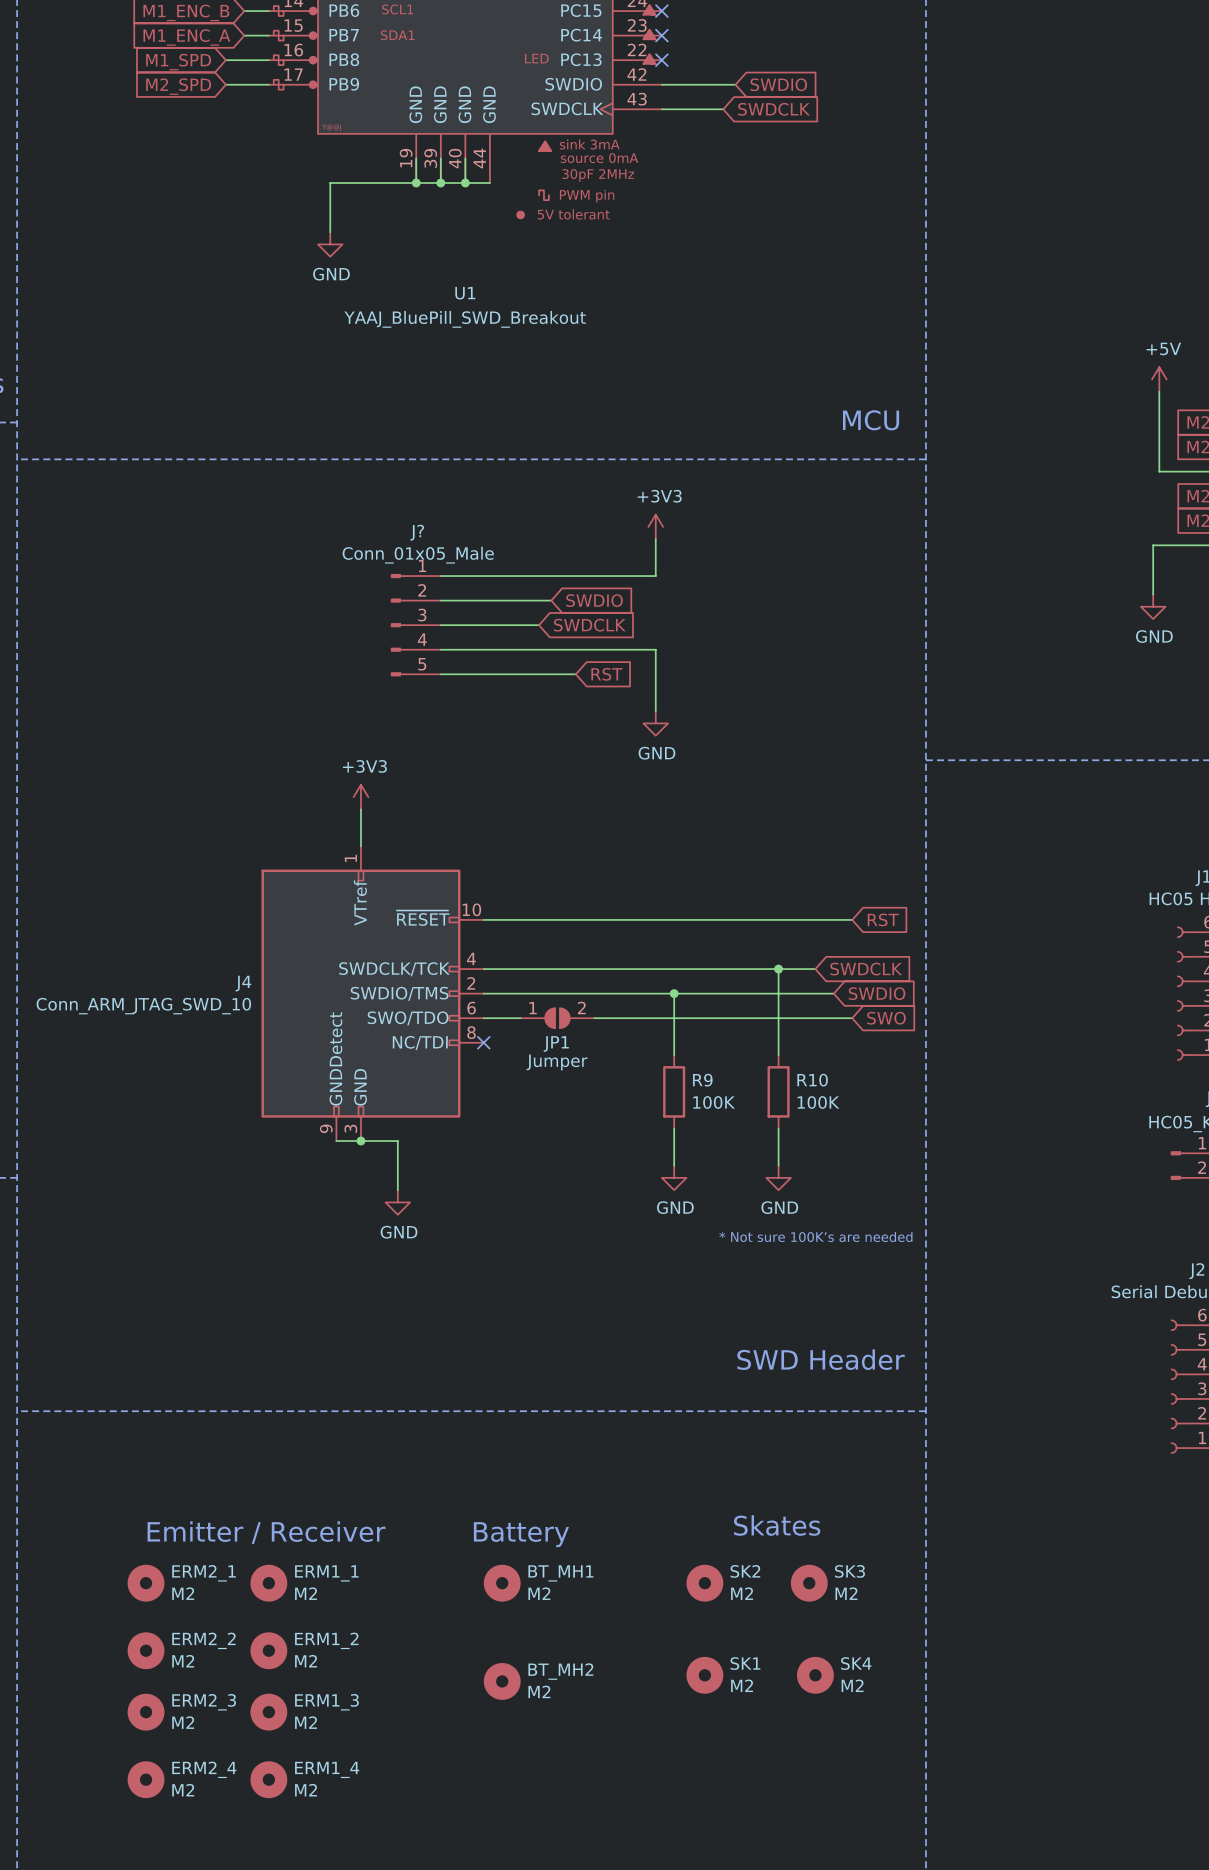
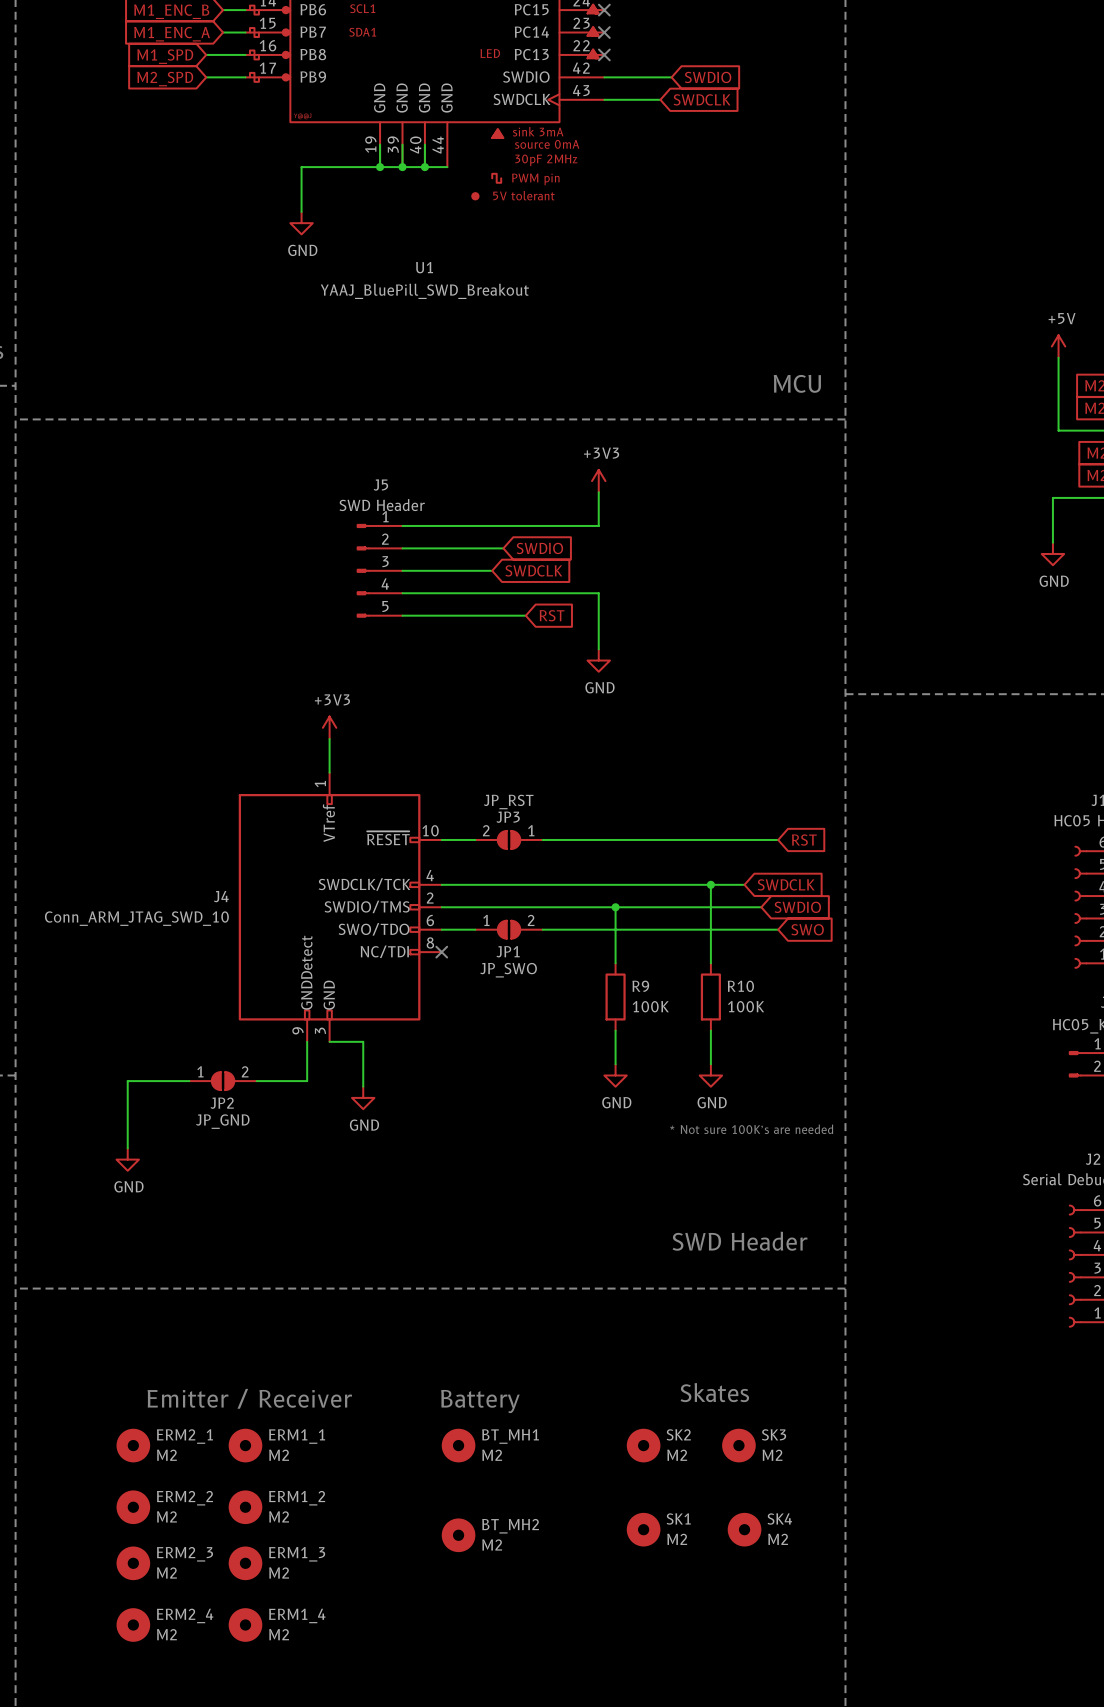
J? name: J? (417, 532) -> J5 (380, 485)
J? value: Conn_01x05_Male (418, 555) -> SWD Header (382, 505)
JP3: none -> JP_RST (509, 839)
JP1 value: Jumper (557, 1062) -> JP_SWO (508, 970)
wire: (336, 1141) (360, 1141) -> (307, 1041) (307, 1081) (256, 1081)
junction: (360, 1141) -> none
wire: none -> (189, 1081) (127, 1081) (127, 1148)
JP2: none -> JP_GND (223, 1081)
power symbol: none -> GND (127, 1159)

